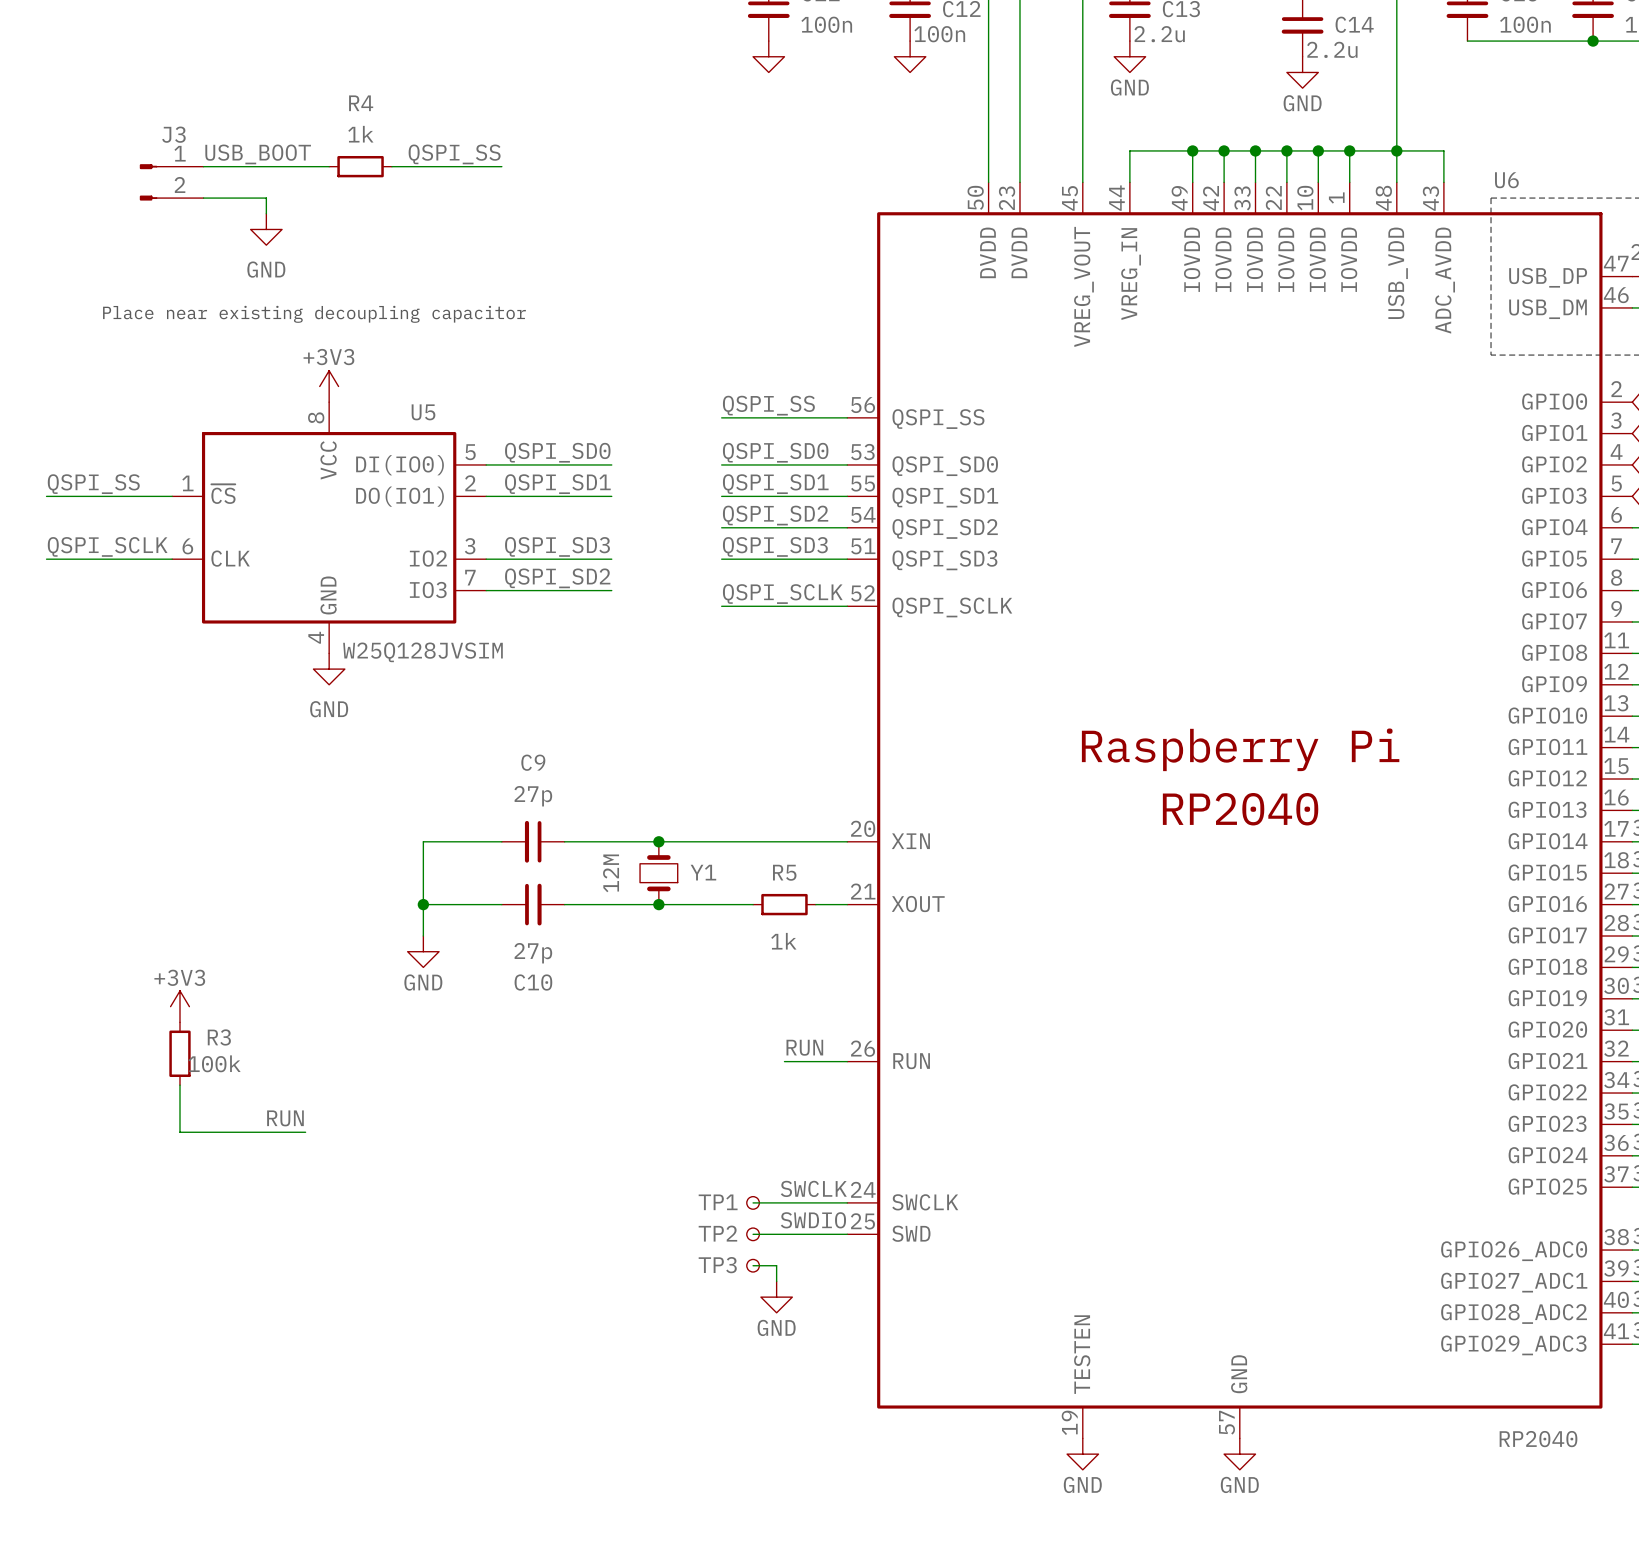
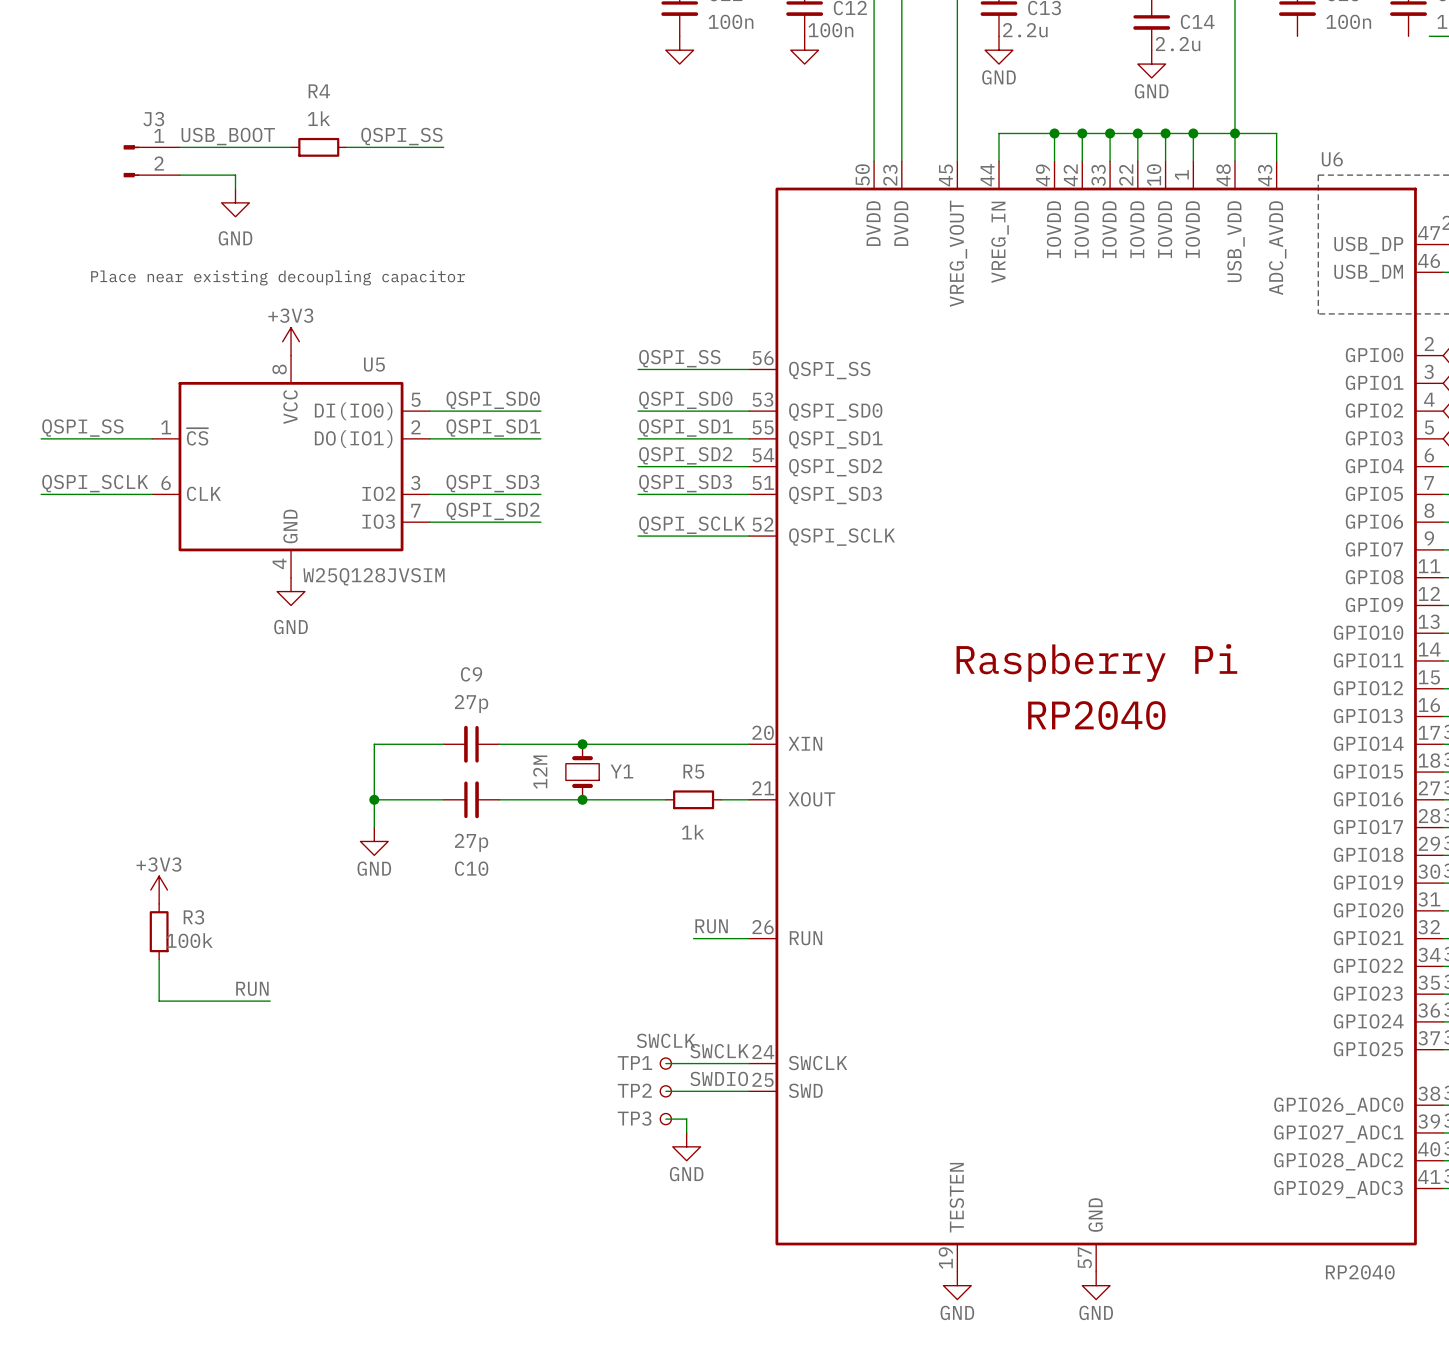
wire: (1467, 41) (1616, 41) -> none
junction: (1593, 41) -> none
TP1 value: none -> SWCLK (666, 1040)

